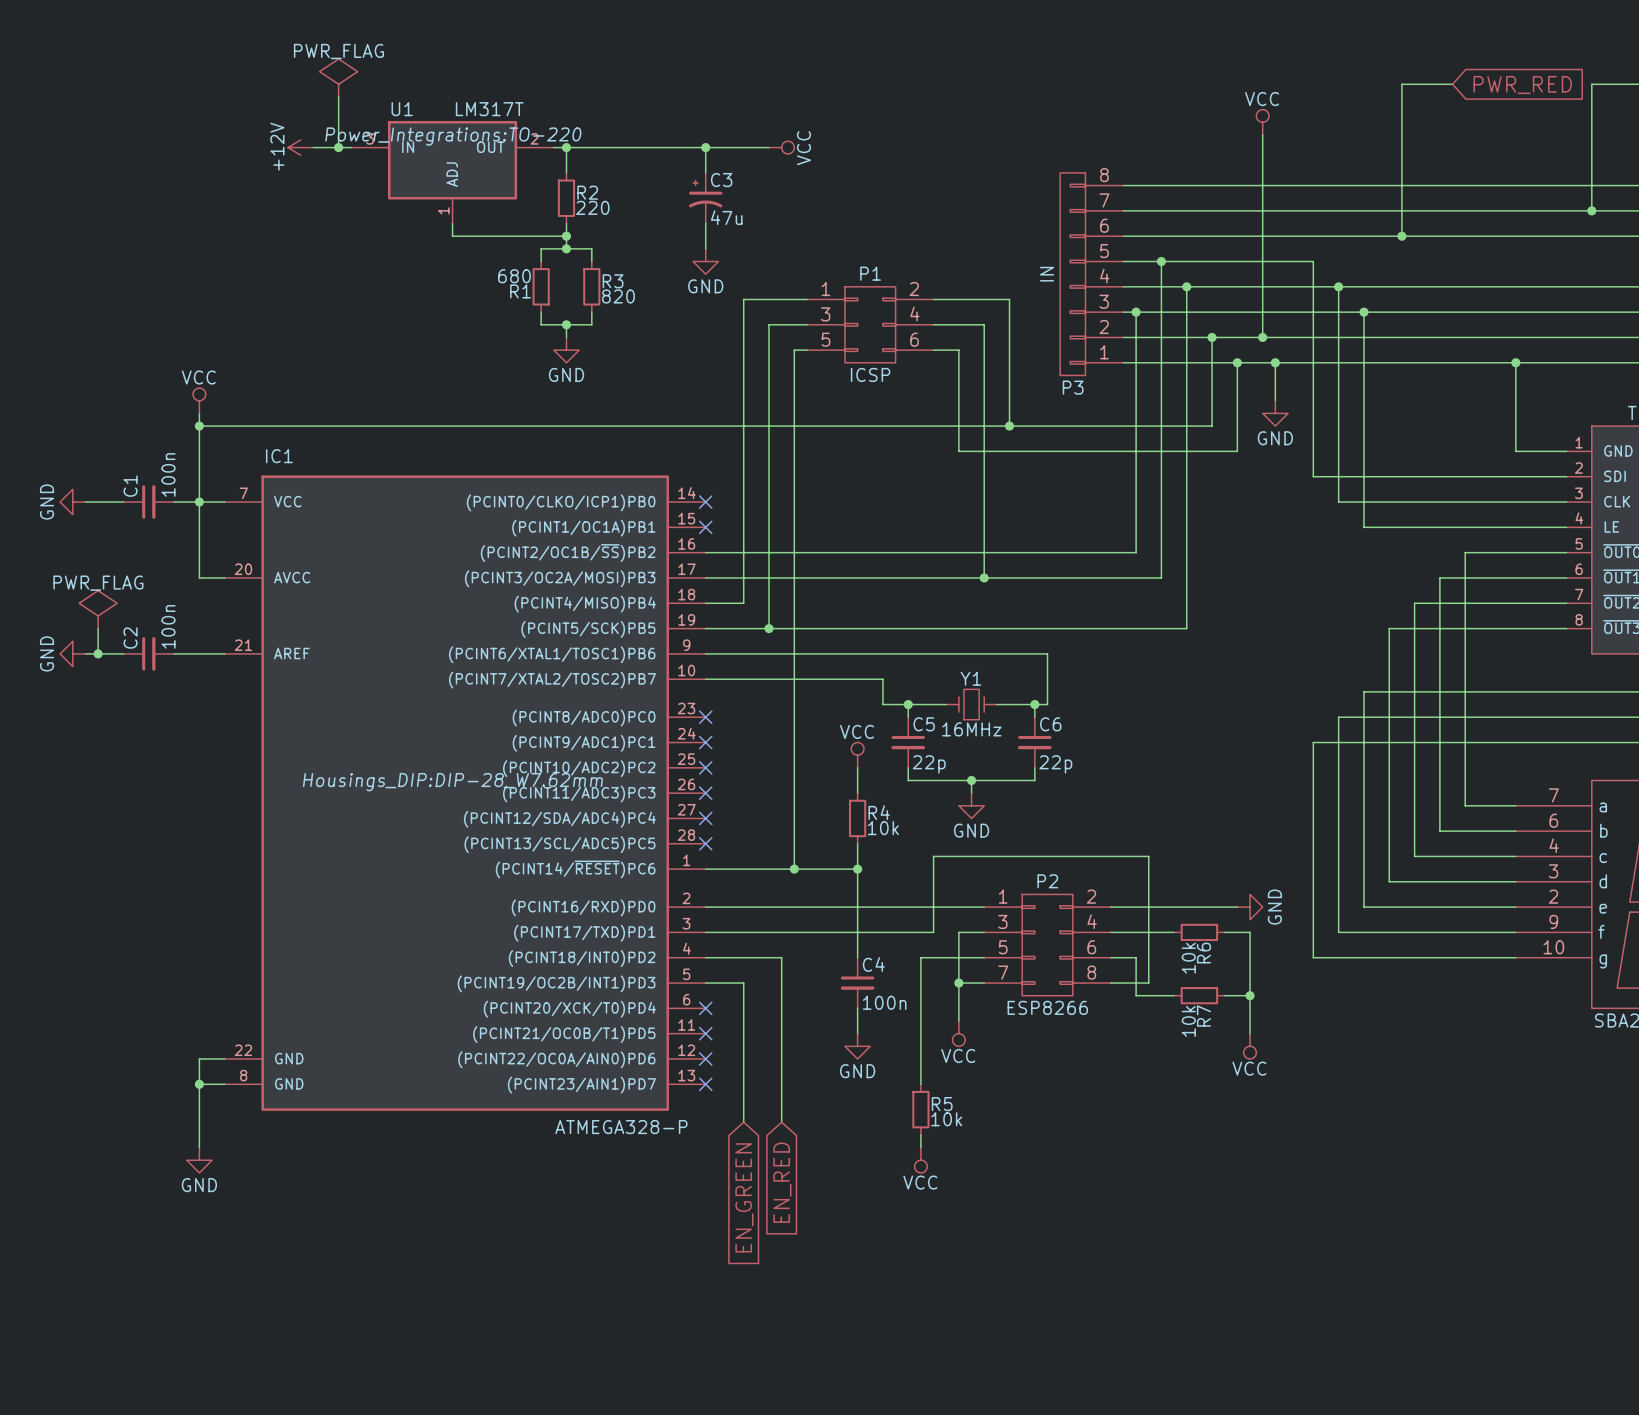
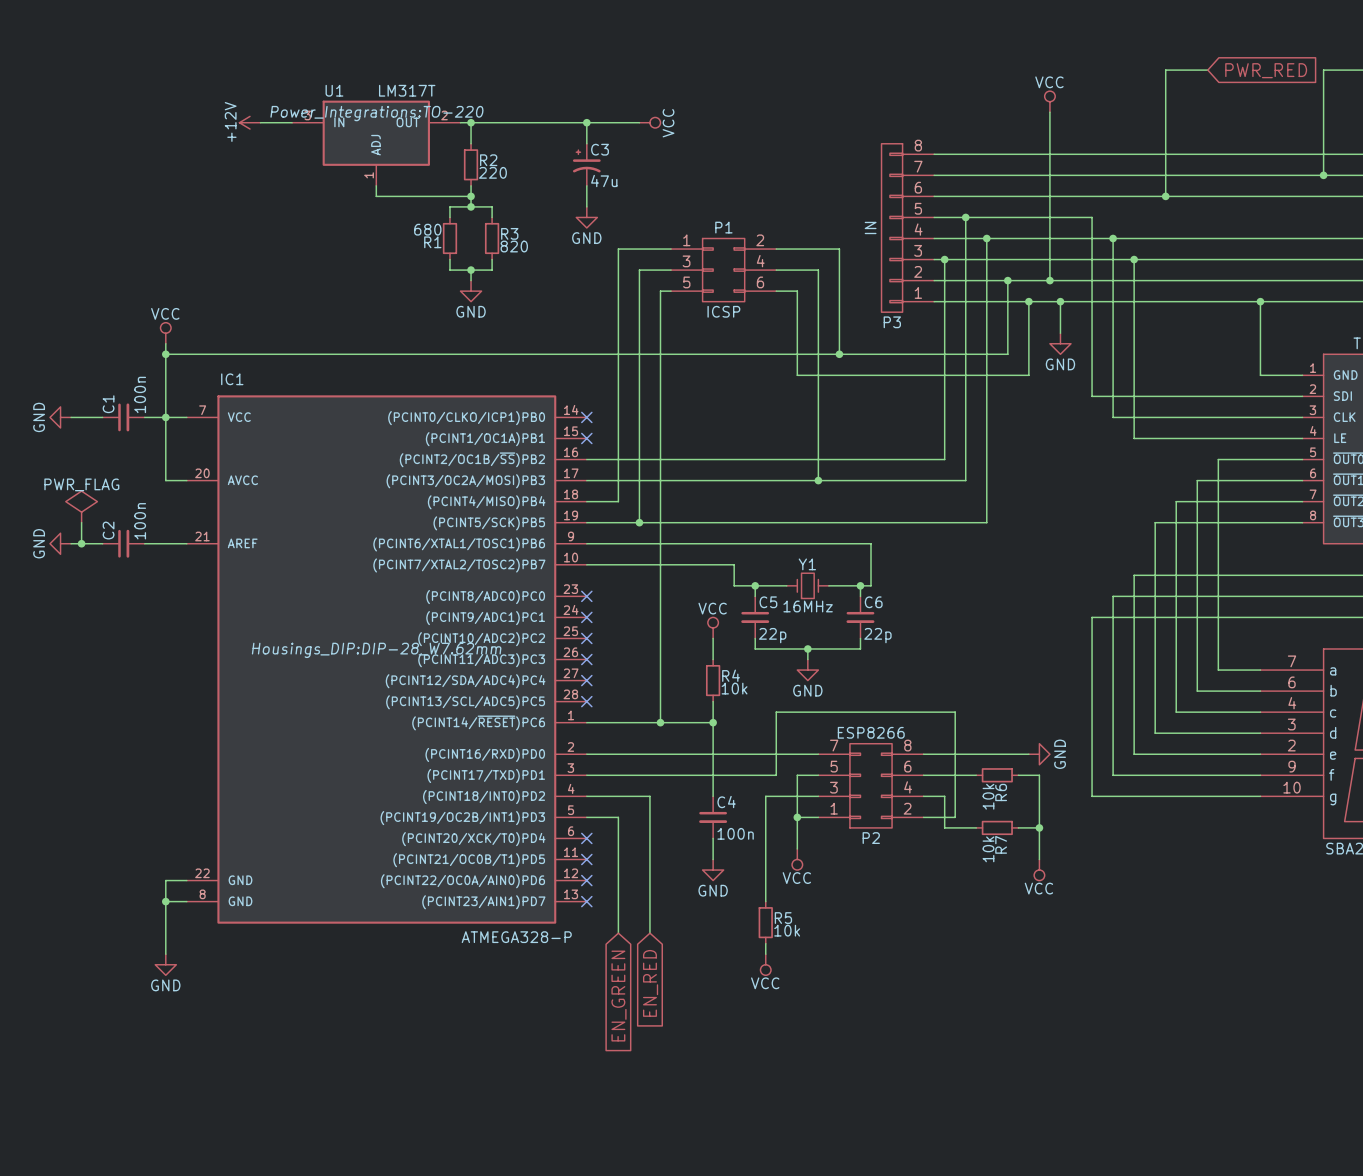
power symbol: PWR_FLAG (338, 77) -> none
wire: (338, 96) (338, 147) -> none
junction: (338, 147) -> none
P2 flip: as is (1047, 945) -> up-down (871, 785)

